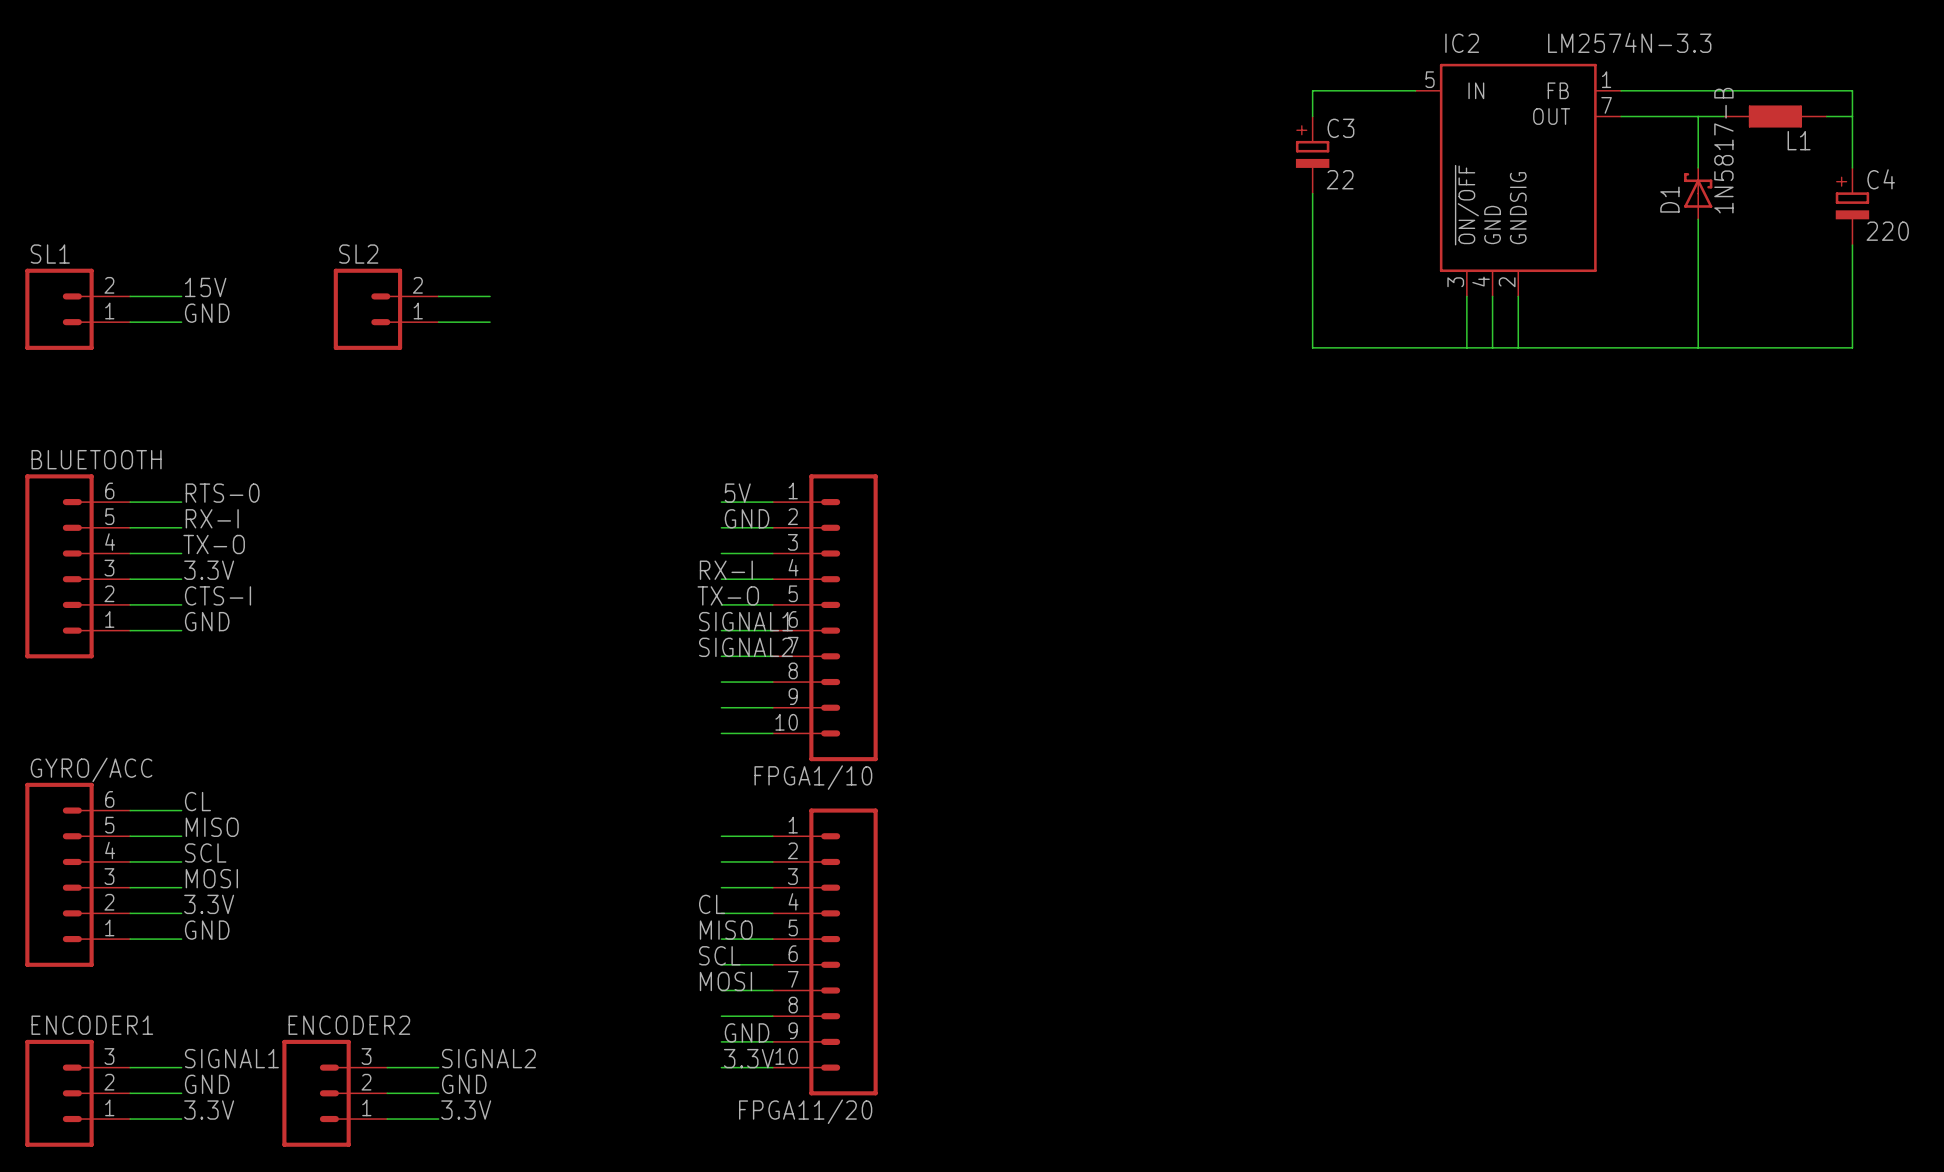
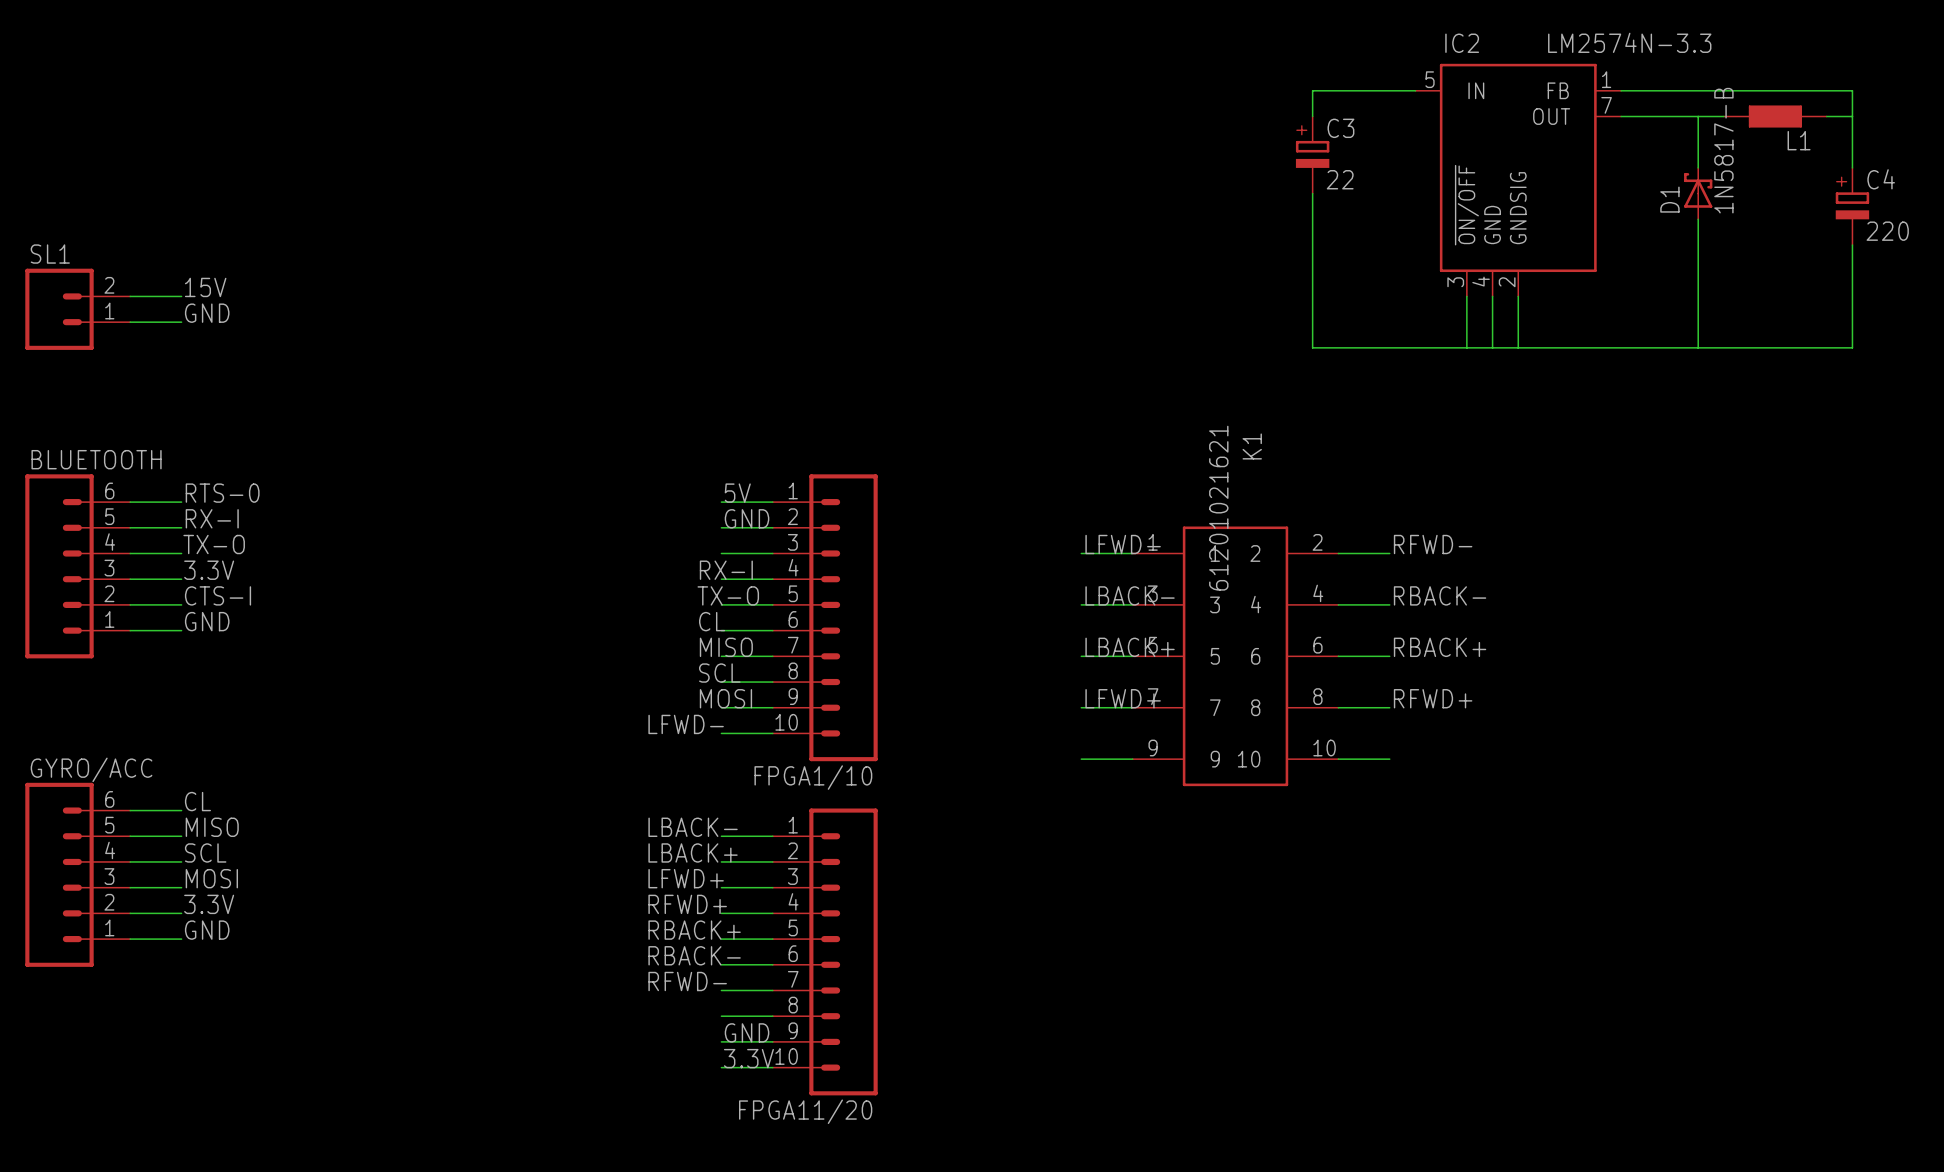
wire: (438, 296) (490, 296) -> none
SL2: (386, 309) -> none
wire: (438, 322) (490, 322) -> none
label: none -> LFWD- (1123, 544)
label: none -> RFWD- (1433, 544)
wire: none -> (1081, 553) (1132, 553)
wire: none -> (1338, 553) (1389, 553)
label: none -> LBACK- (1130, 595)
label: none -> RBACK- (1440, 595)
wire: none -> (1081, 604) (1132, 604)
wire: none -> (1338, 604) (1389, 604)
label: SIGNAL1 (746, 621) -> CL (712, 621)
label: SIGNAL2 (746, 647) -> MISO (726, 647)
label: none -> LBACK+ (1130, 647)
label: none -> RBACK+ (1440, 647)
wire: none -> (1081, 656) (1132, 656)
K1: none -> 61201021621 (1235, 656)
wire: none -> (1338, 656) (1389, 656)
label: none -> SCL (719, 673)
label: none -> MOSI (725, 698)
label: none -> LFWD+ (1123, 698)
label: none -> RFWD+ (1433, 698)
wire: none -> (1081, 707) (1132, 707)
wire: none -> (1338, 707) (1389, 707)
label: none -> LFWD- (686, 724)
wire: none -> (1081, 759) (1132, 759)
wire: none -> (1338, 759) (1389, 759)
label: none -> LBACK- (693, 827)
label: none -> LBACK+ (693, 852)
label: none -> LFWD+ (686, 878)
label: none -> RFWD+ (687, 904)
label: CL (712, 904) -> none
label: none -> RBACK+ (694, 930)
label: MISO (726, 930) -> none
label: none -> RBACK- (694, 955)
label: SCL (719, 955) -> none
label: none -> RFWD- (687, 981)
label: MOSI (725, 981) -> none
label: SIGNAL1 (231, 1058) -> none
label: SIGNAL2 (488, 1058) -> none
wire: (130, 1067) (181, 1067) -> none
wire: (387, 1067) (438, 1067) -> none
label: GND (207, 1084) -> none
label: GND (464, 1084) -> none
ENCODER1: (77, 1093) -> none
wire: (130, 1093) (181, 1093) -> none
ENCODER2: (334, 1093) -> none
wire: (387, 1093) (438, 1093) -> none
label: 3.3V (209, 1110) -> none
label: 3.3V (466, 1110) -> none
wire: (130, 1119) (181, 1119) -> none
wire: (387, 1119) (438, 1119) -> none

